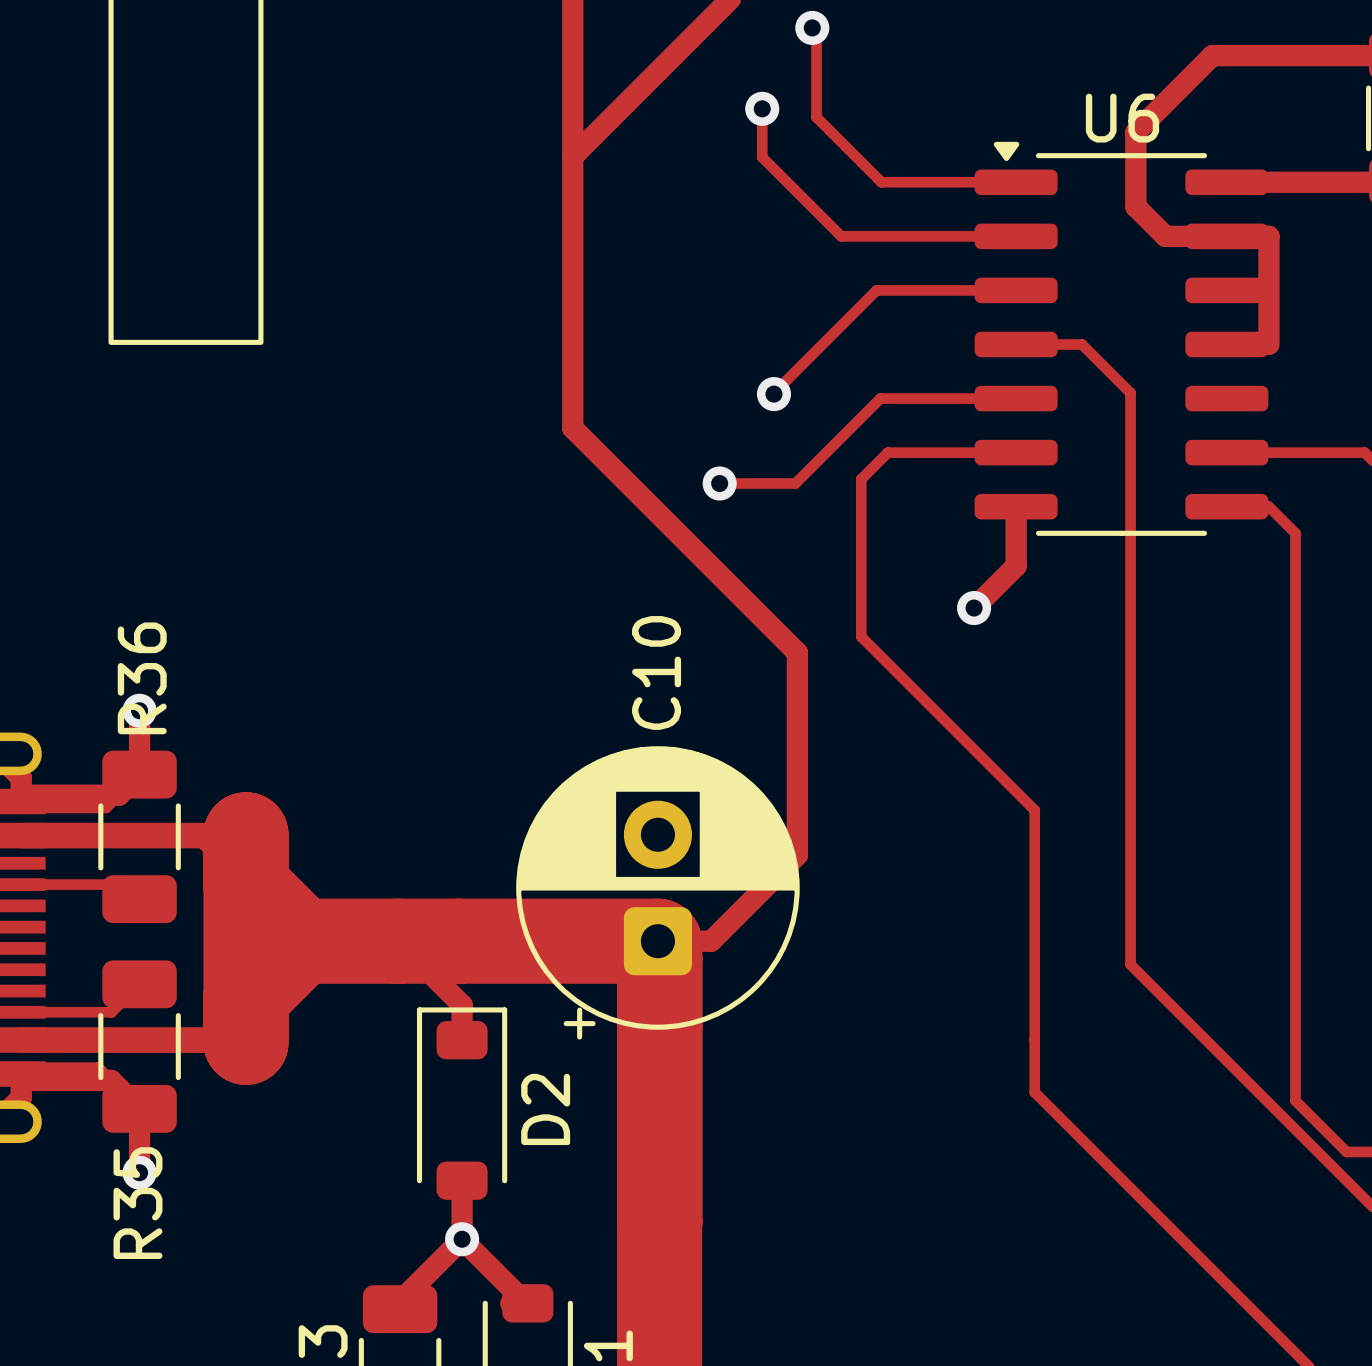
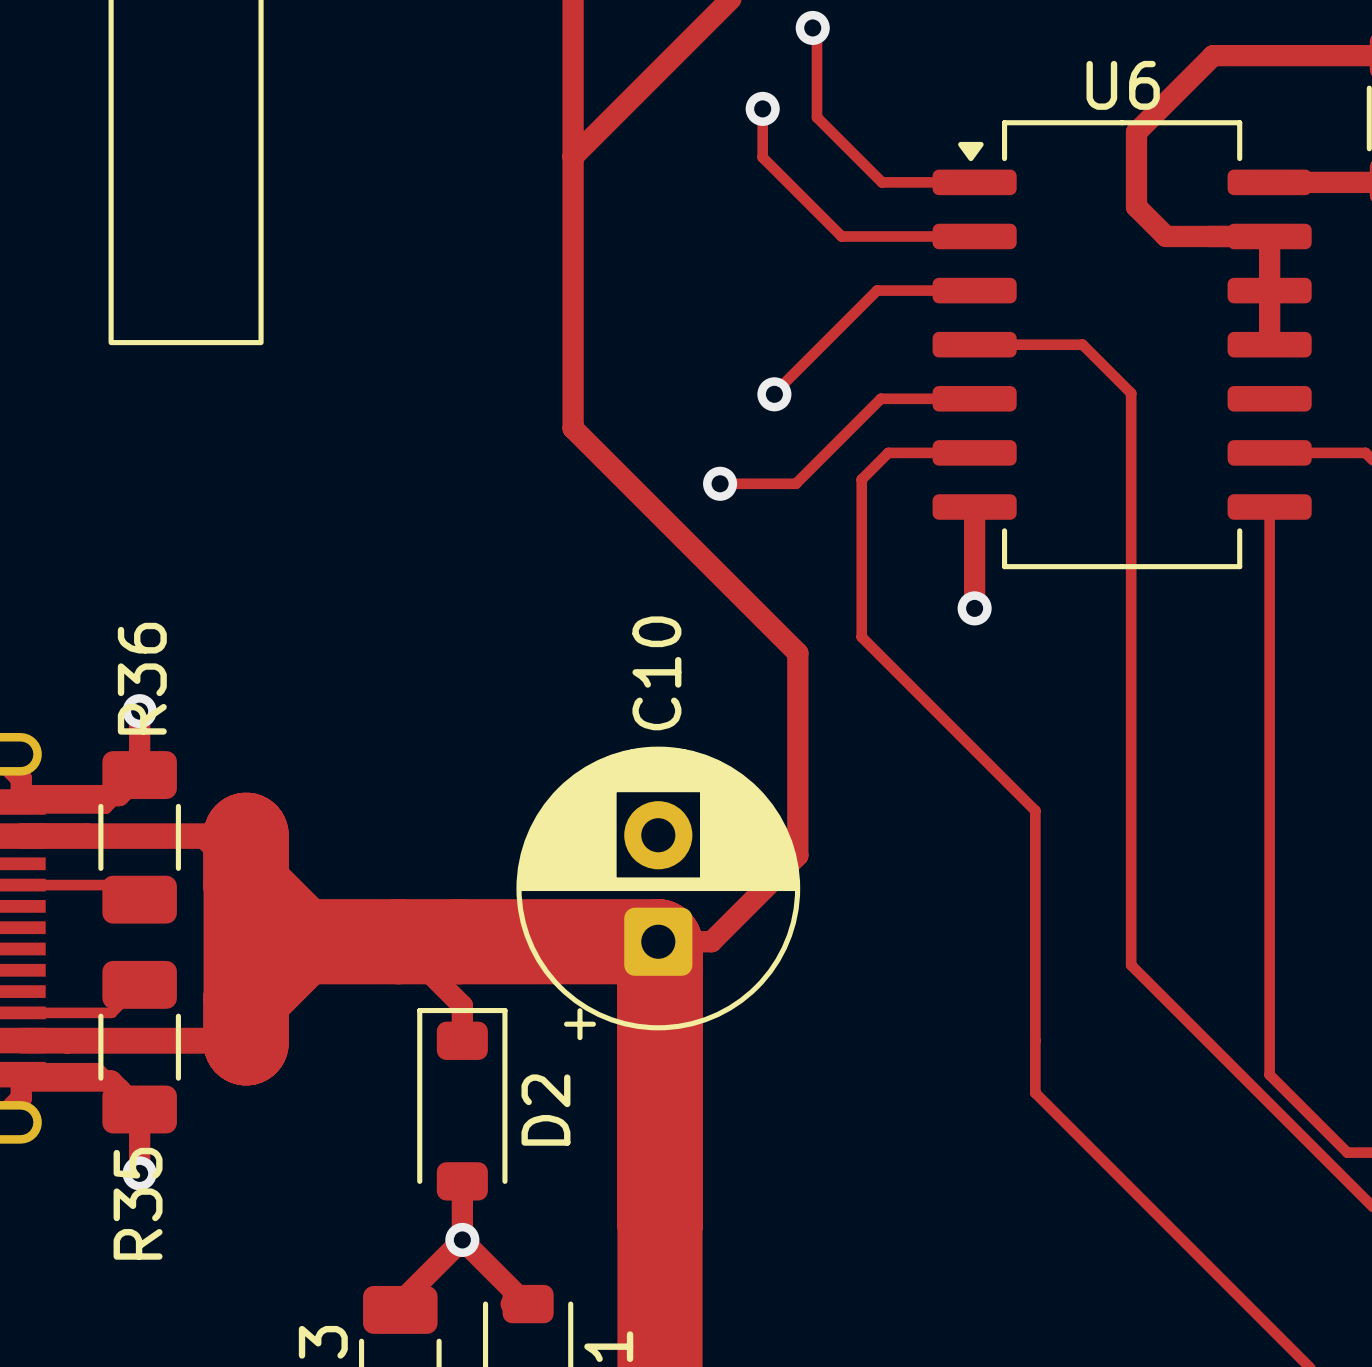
U6 footprint: [974, 141, 1269, 536] -> [932, 120, 1312, 570]
track: (1016, 506) (1016, 566) (974, 608) -> (974, 507) (974, 608)
track: (1226, 506) (1268, 506) (1295, 533) (1295, 1100) -> (1269, 507) (1269, 1074) (1296, 1101)

